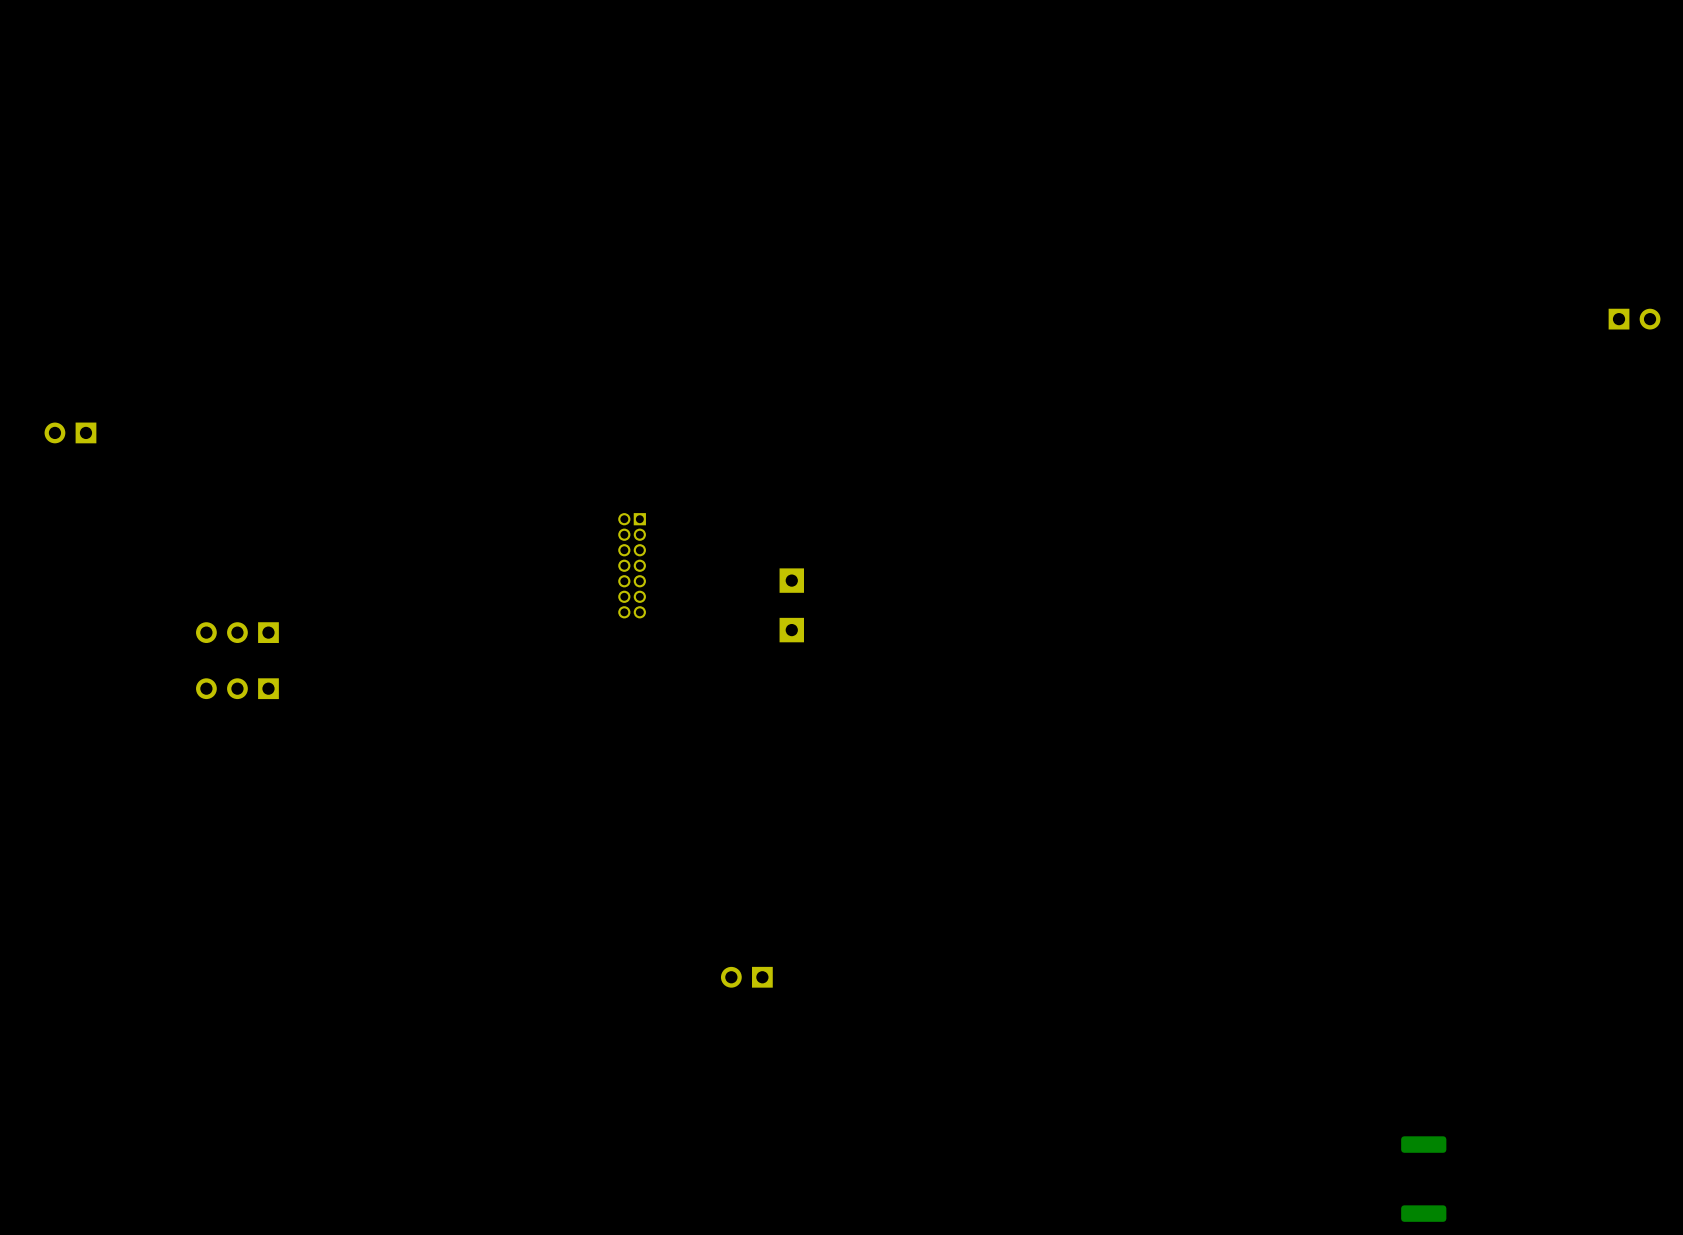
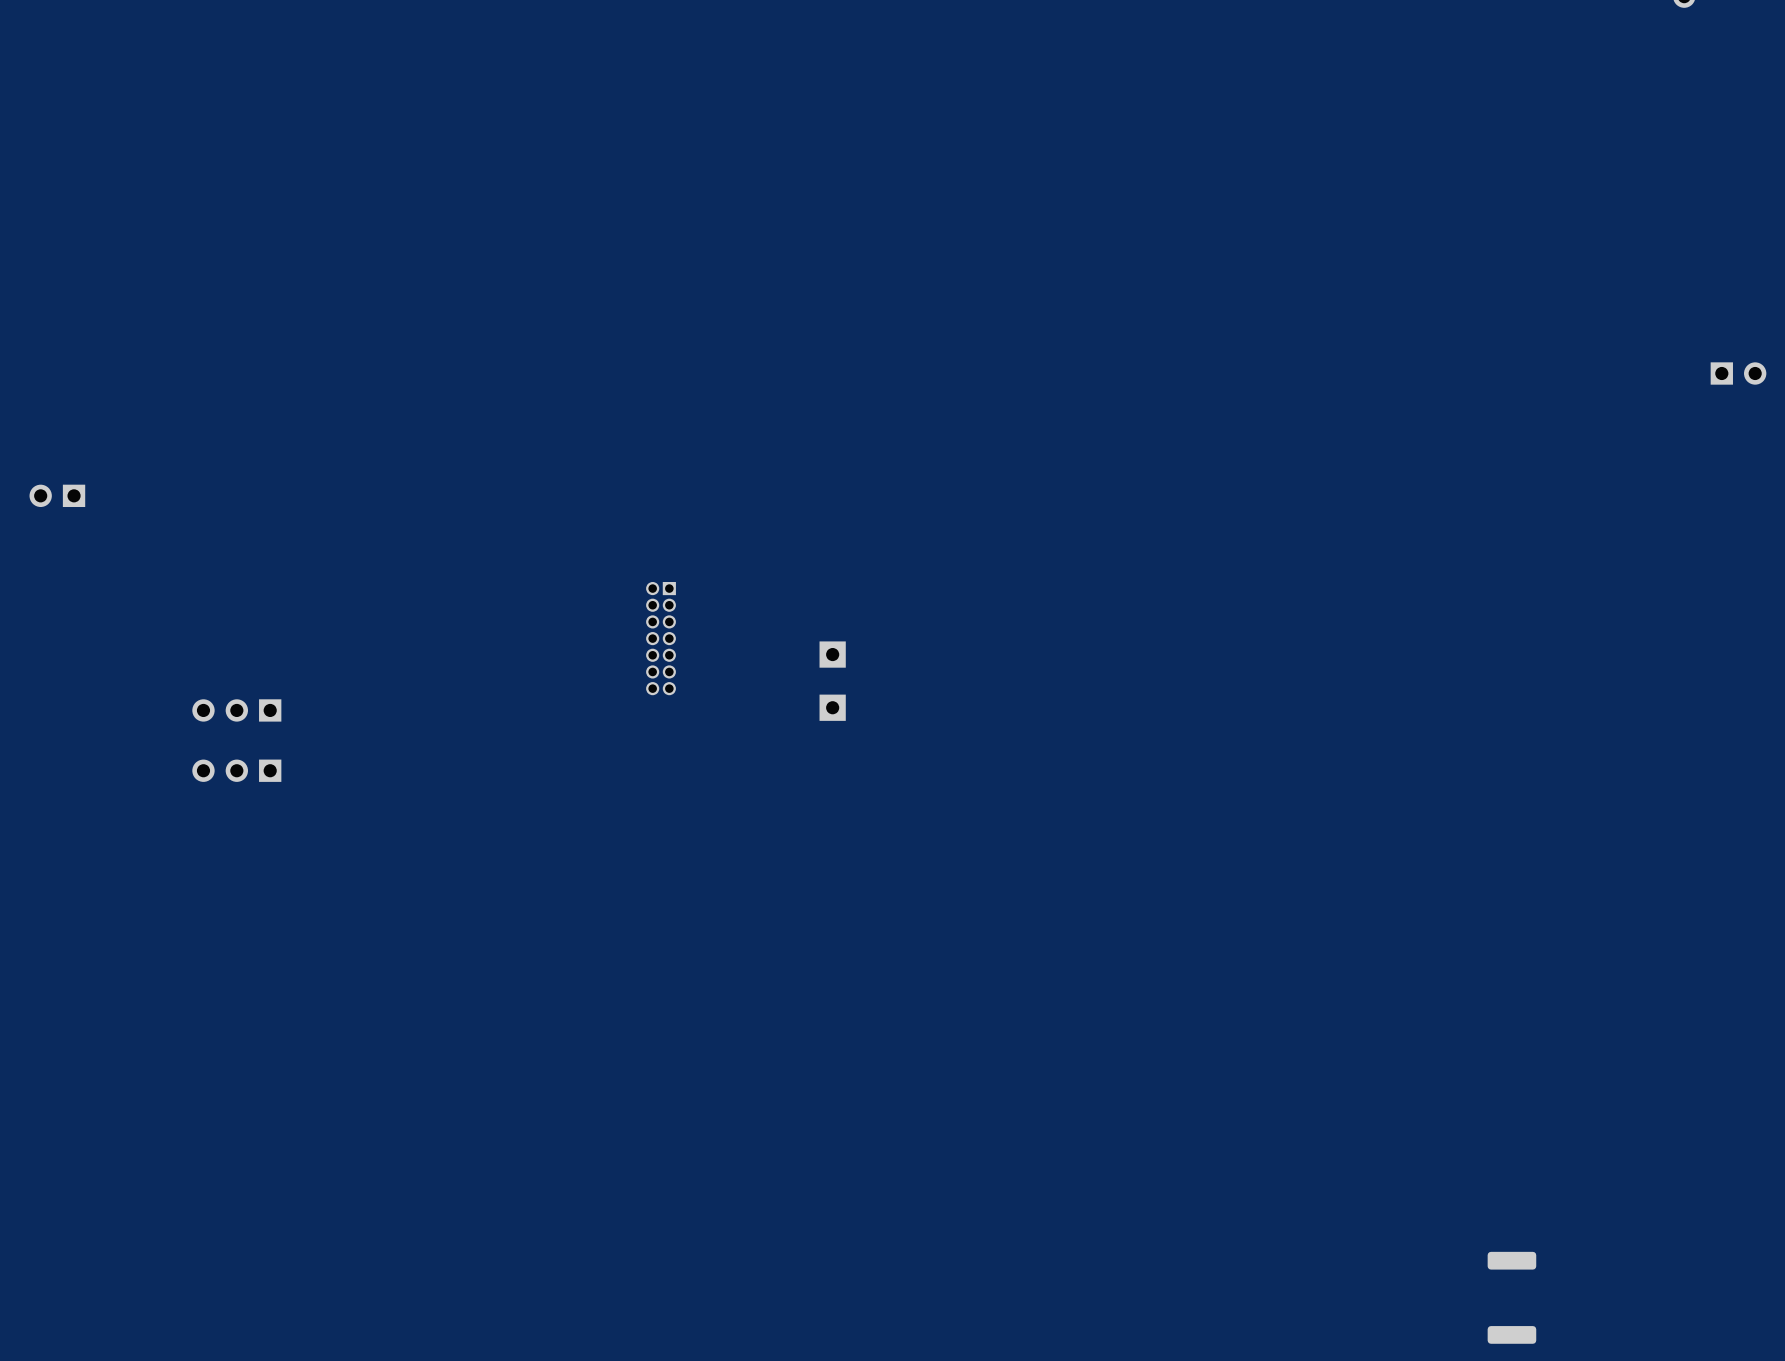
part: (746, 977) -> none

